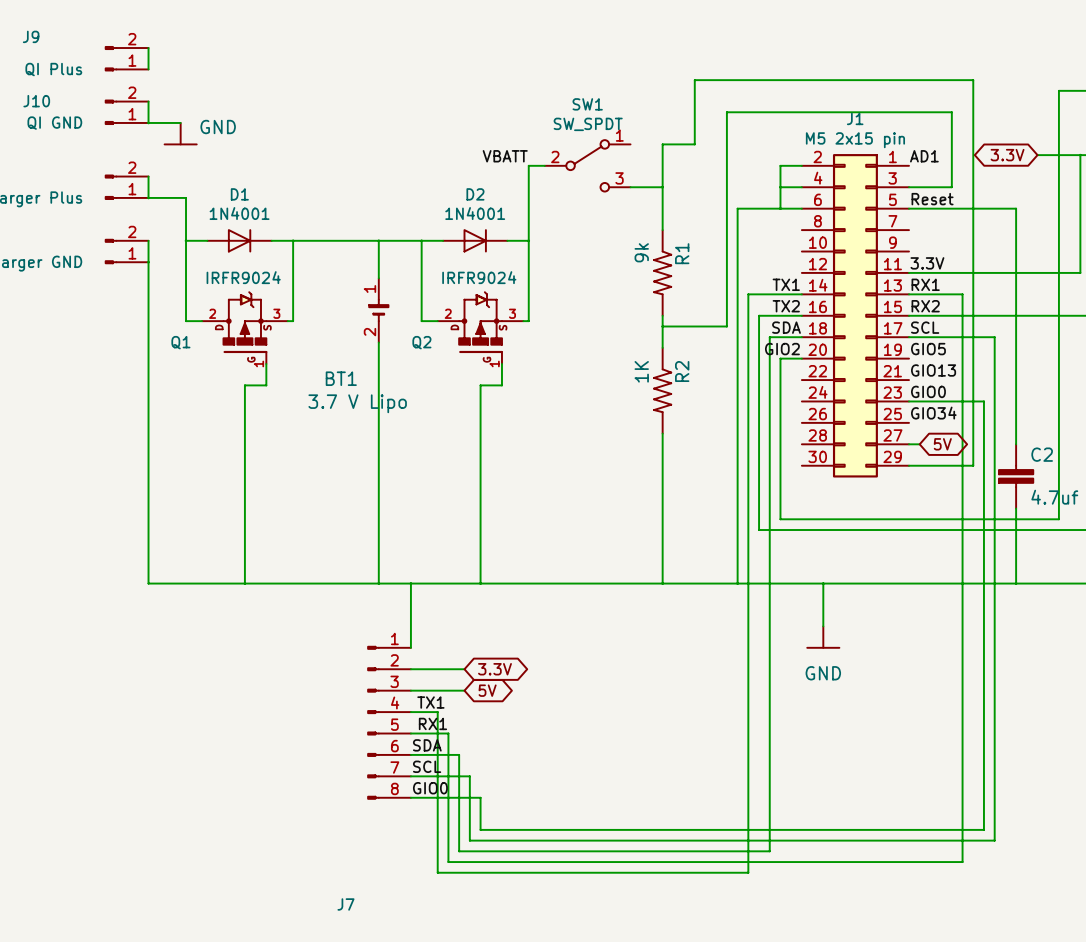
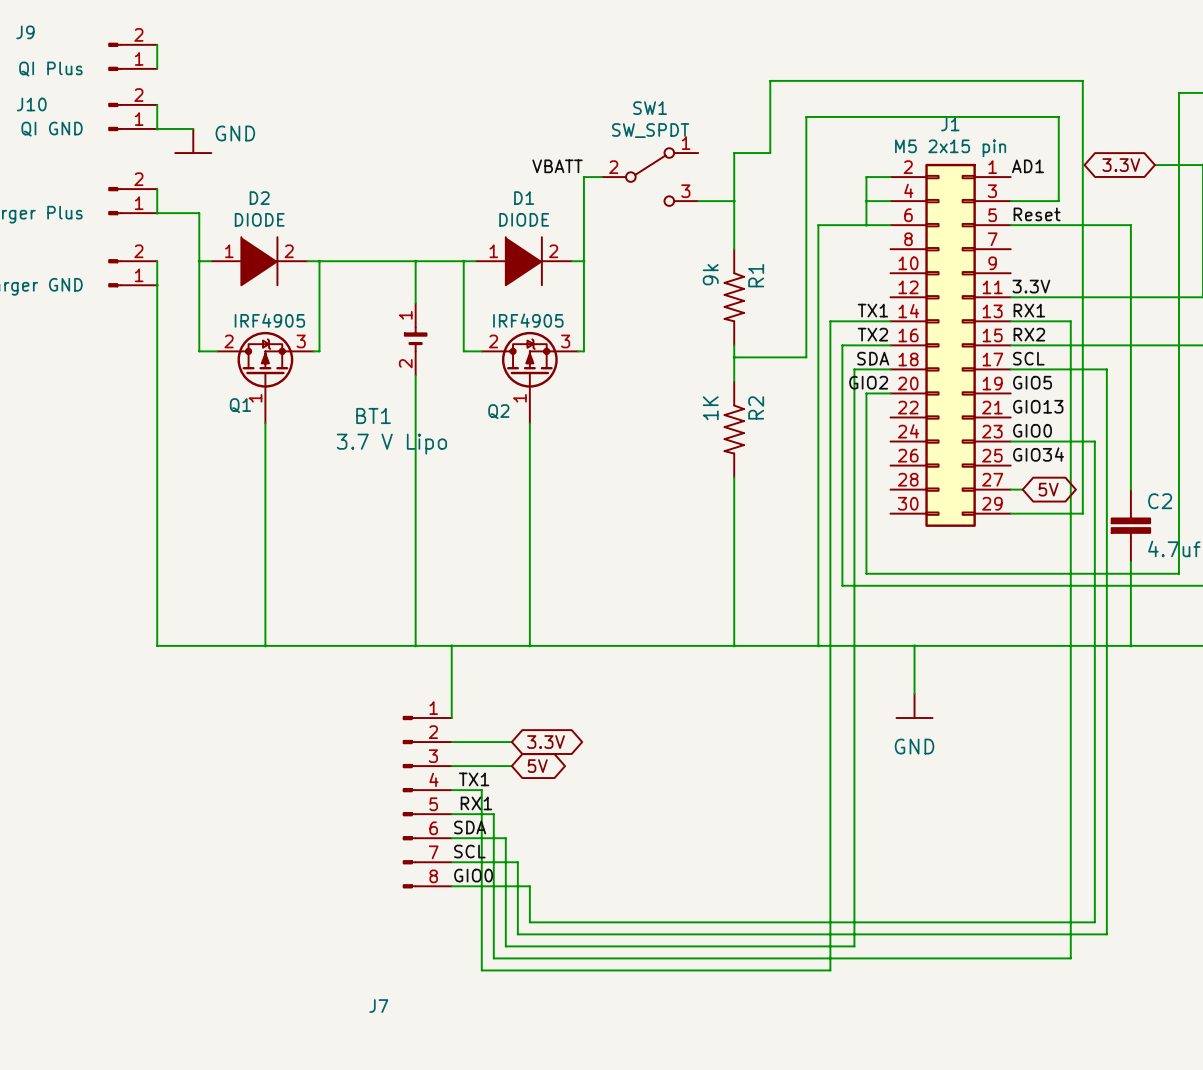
D1 value: 1N4001 (239, 213) -> DIODE (524, 219)
D2 value: 1N4001 (475, 213) -> DIODE (259, 219)
D1 symbol: [207, 229, 272, 253] -> [475, 237, 572, 286]
D2 symbol: [443, 229, 508, 253] -> [211, 237, 308, 286]
Q1 value: IRFR9024 (243, 277) -> IRF4905 (269, 320)
Q2 value: IRFR9024 (479, 277) -> IRF4905 (528, 320)
Q1 symbol: [202, 291, 288, 365] -> [217, 331, 314, 424]
Q2 symbol: [437, 291, 524, 365] -> [481, 331, 578, 424]
Q1 name position: Q1 (180, 342) -> Q1 (240, 405)
Q2 name position: Q2 (421, 342) -> Q2 (498, 411)
wire: (266, 363) (266, 385) (244, 385) -> none
wire: (501, 363) (501, 385) (480, 385) -> none

